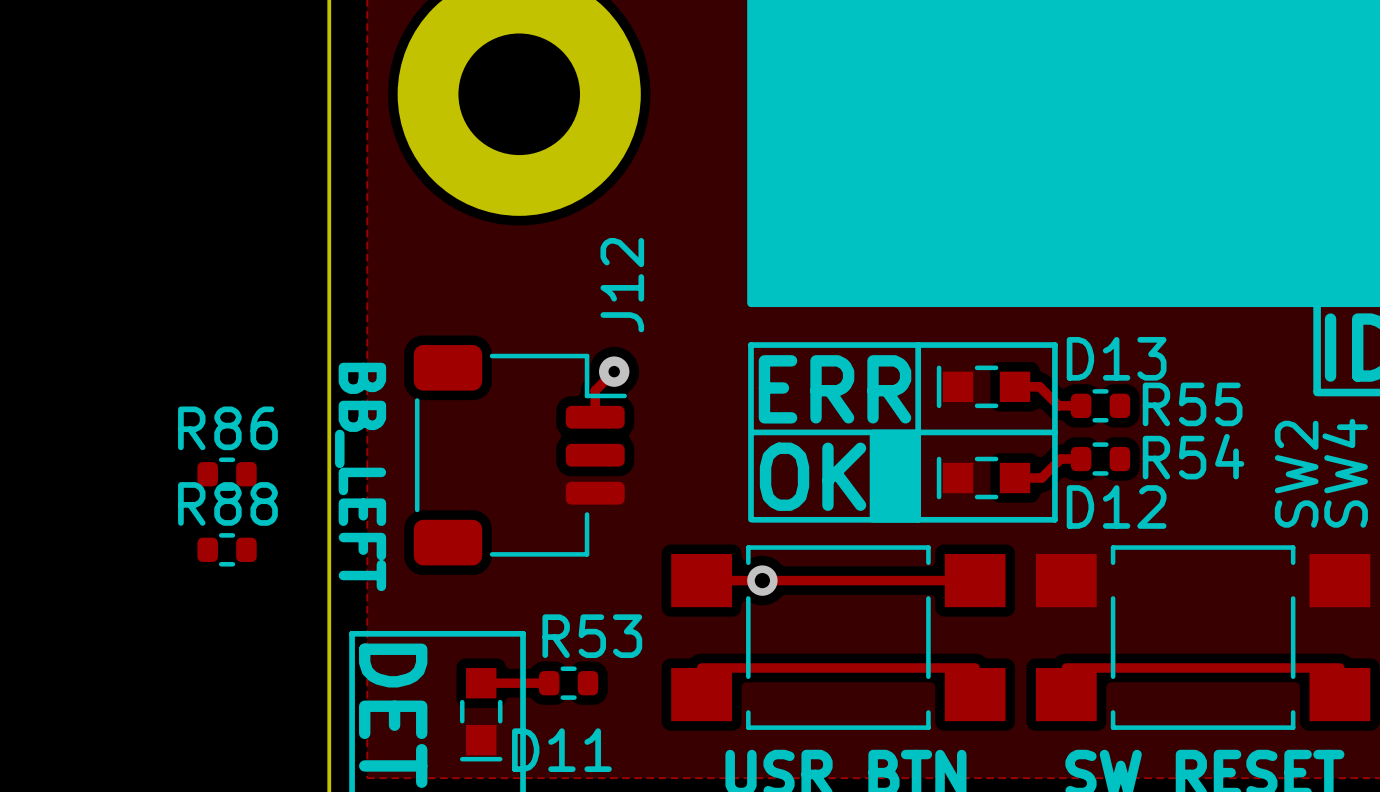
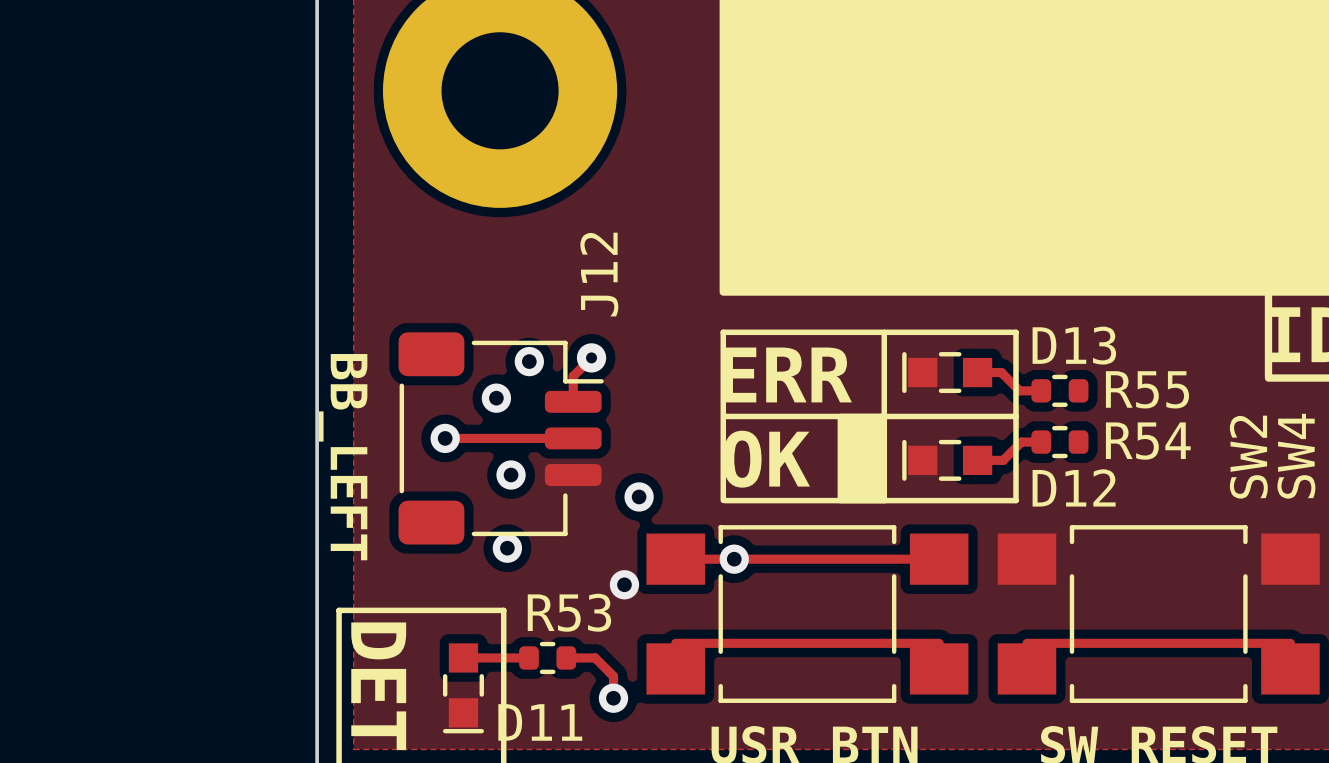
via: none -> (529, 361)
via: none -> (496, 398)
track: none -> (445, 438) (573, 438)
via: none -> (445, 438)
R86: (227, 474) -> none
via: none -> (511, 475)
via: none -> (639, 496)
R88: (227, 549) -> none
via: none -> (507, 548)
via: none -> (624, 584)
track: none -> (566, 657) (595, 657) (613, 676) (613, 698)
via: none -> (613, 698)

